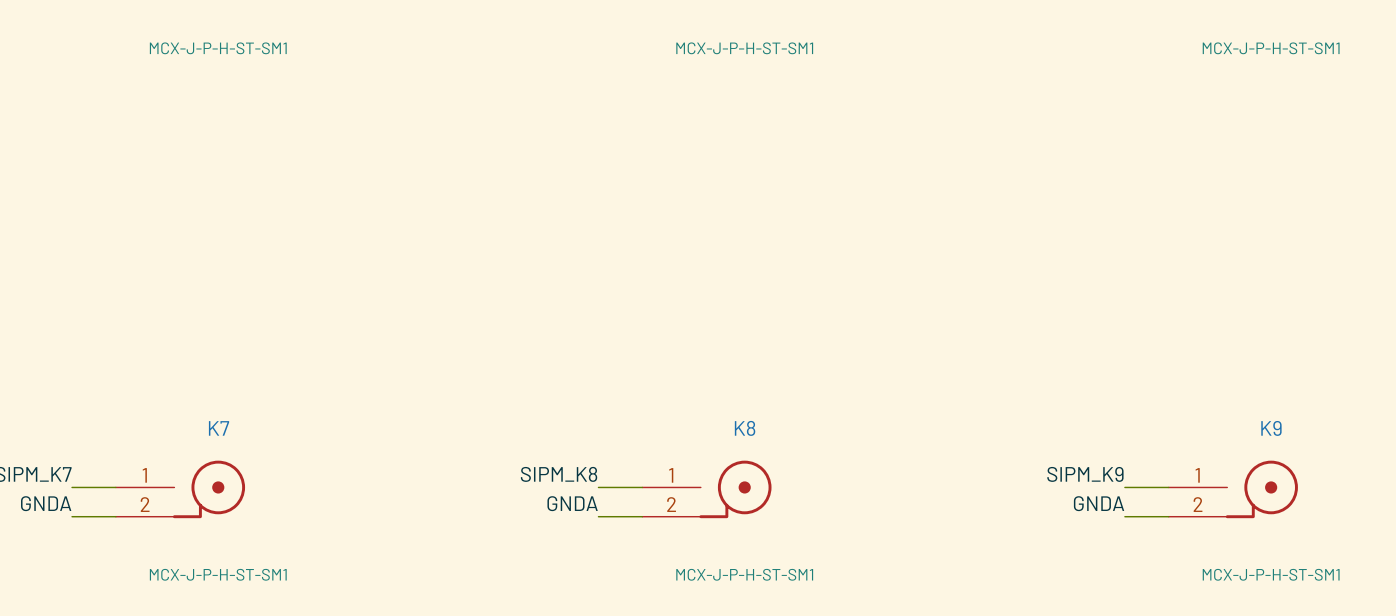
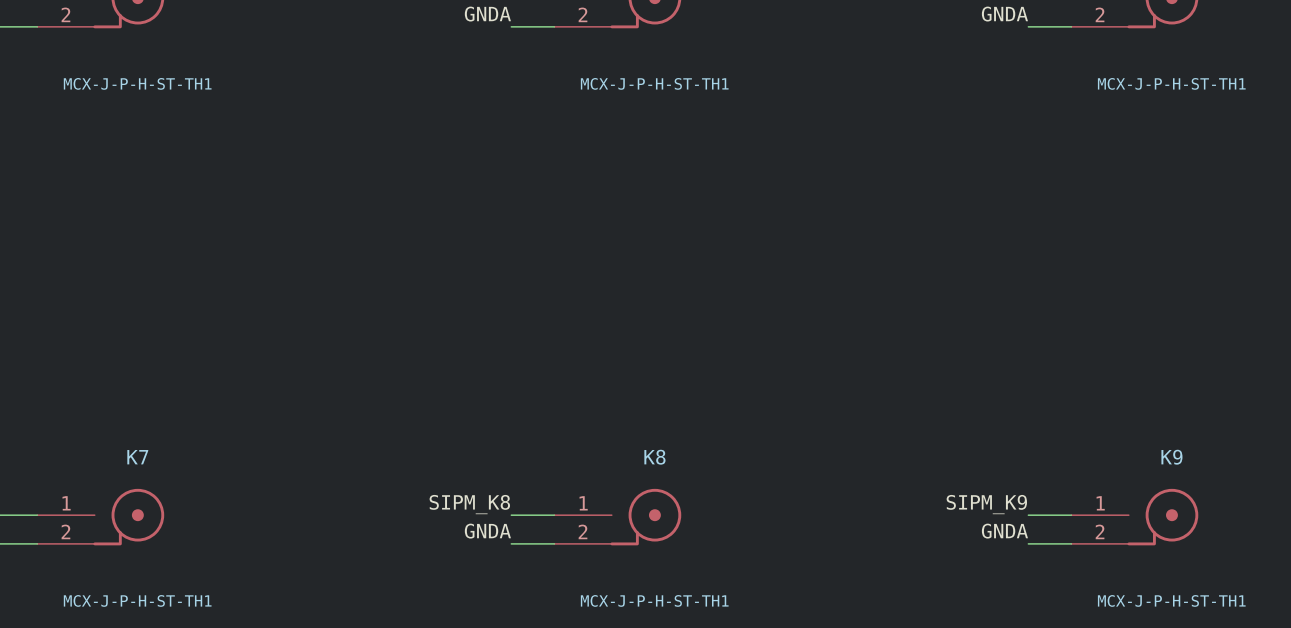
part value: MCX-J-P-H-ST-SM1 (218, 48) -> MCX-J-P-H-ST-TH1 (137, 83)
part value: MCX-J-P-H-ST-SM1 (744, 48) -> MCX-J-P-H-ST-TH1 (654, 83)
part value: MCX-J-P-H-ST-SM1 (1271, 48) -> MCX-J-P-H-ST-TH1 (1171, 83)
K7 value: MCX-J-P-H-ST-SM1 (218, 574) -> MCX-J-P-H-ST-TH1 (137, 600)
K8 value: MCX-J-P-H-ST-SM1 (744, 574) -> MCX-J-P-H-ST-TH1 (654, 600)
K9 value: MCX-J-P-H-ST-SM1 (1271, 574) -> MCX-J-P-H-ST-TH1 (1171, 600)

